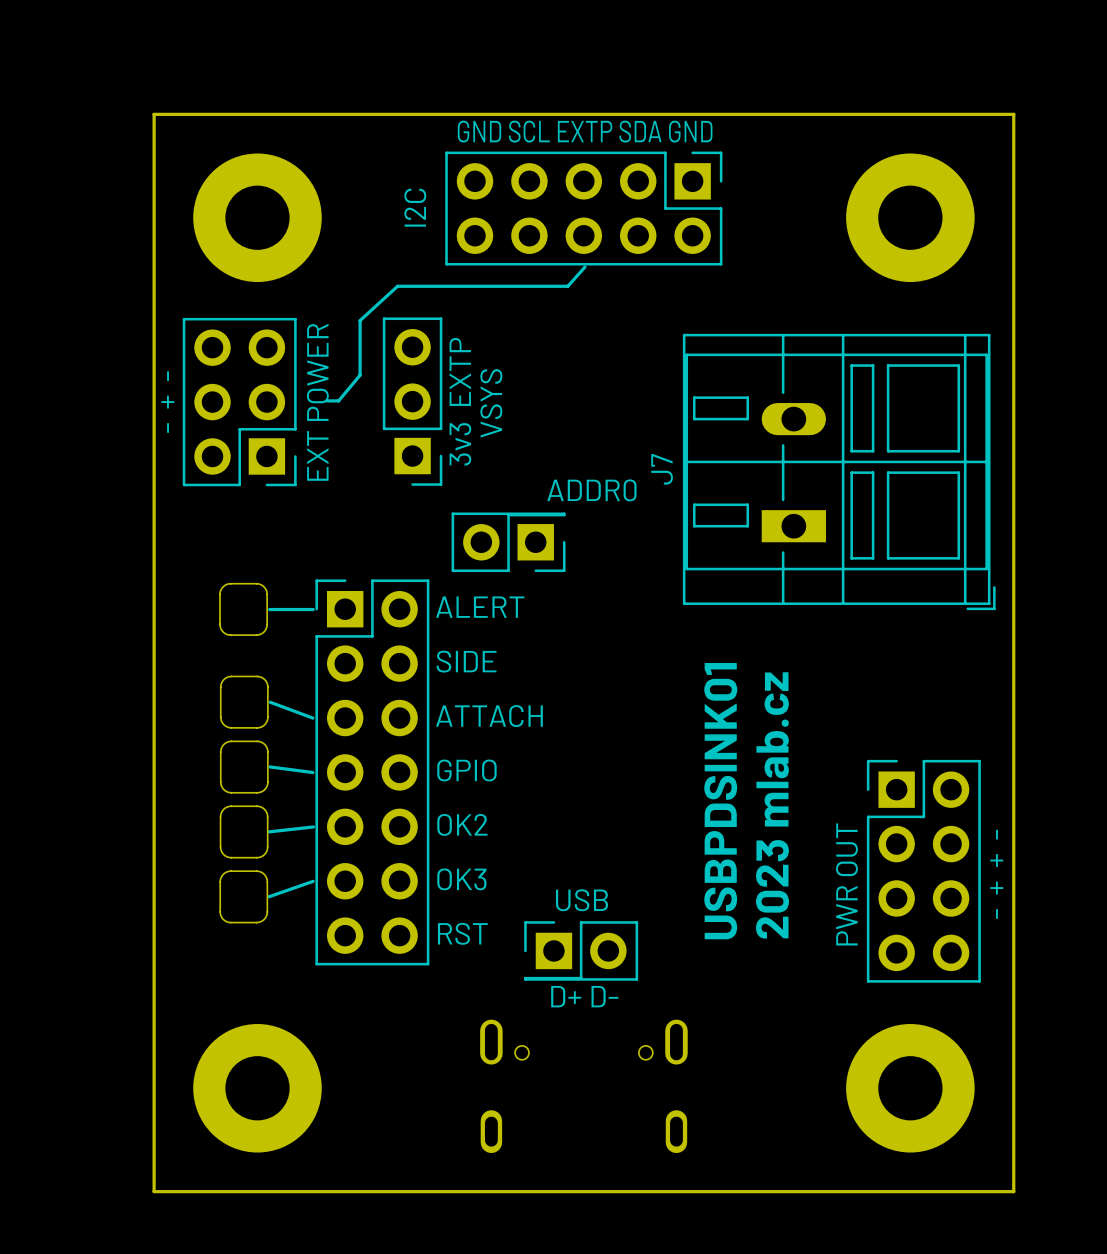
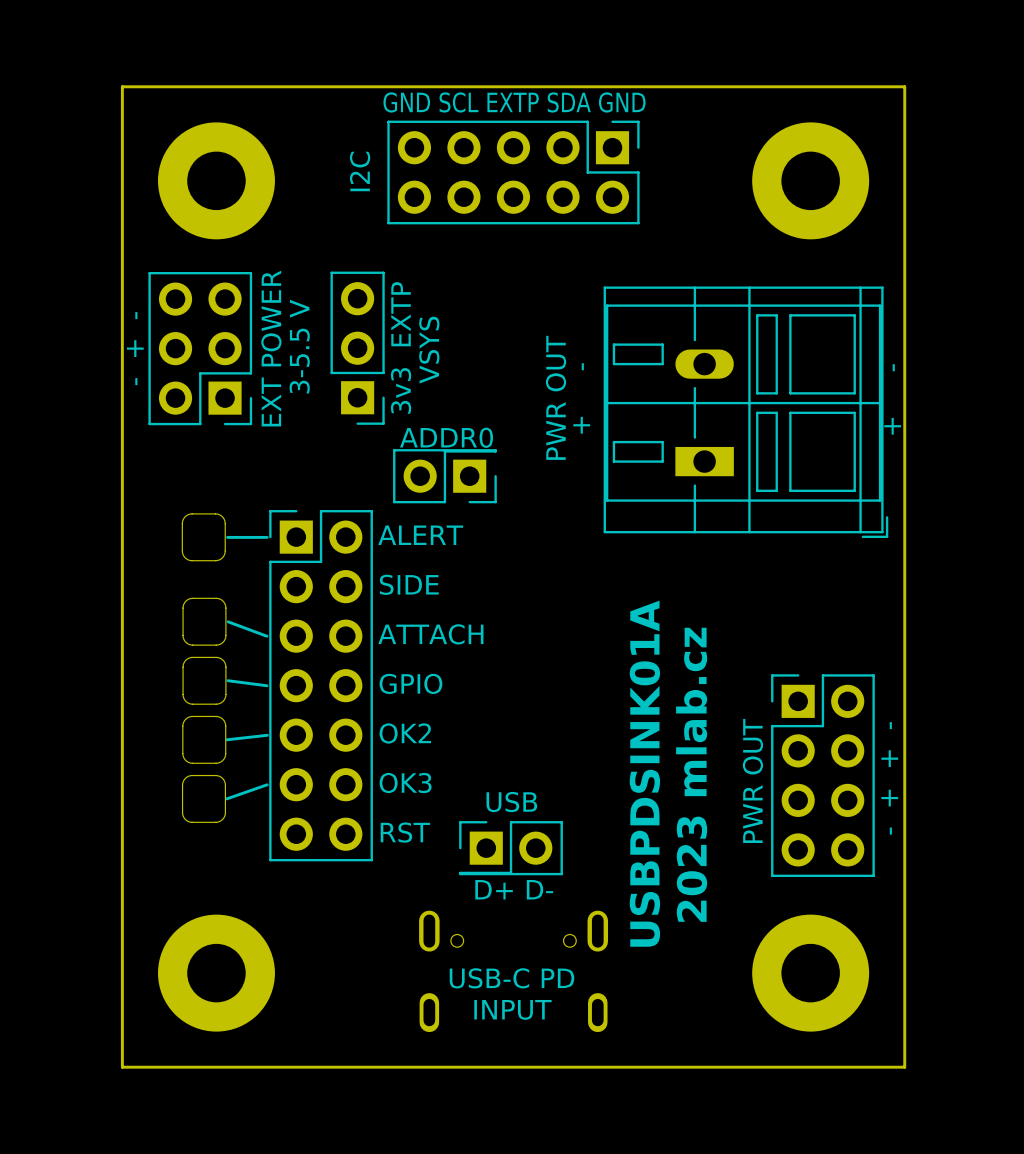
line: (585, 267) (567, 286) (397, 286) (360, 320) (360, 375) (338, 400) (326, 400) -> none
text: none -> 3-5.5 V (299, 346)
text: none -> PWR OUT (556, 397)
text: none -> + - (581, 398)
text: none -> + - (892, 399)
J7 name: J7 (662, 469) -> none
text position: ADDR0 (591, 490) -> ADDR0 (446, 437)
text: USBPDSINK01 (720, 801) -> USBPDSINK01A (644, 773)
text position: 2023 mlab.cz (772, 805) -> 2023 mlab.cz (691, 774)
text: none -> USB-C PD (511, 978)
text: none -> INPUT (512, 1009)

